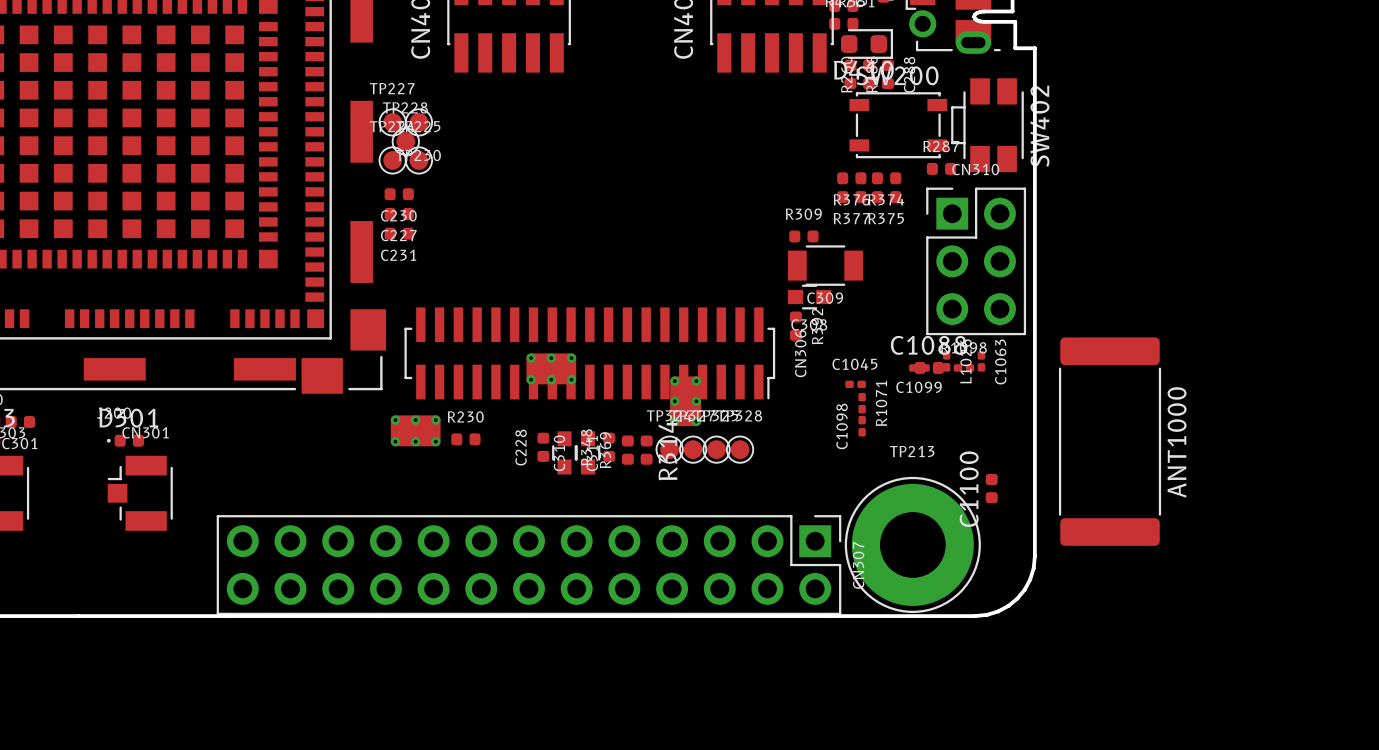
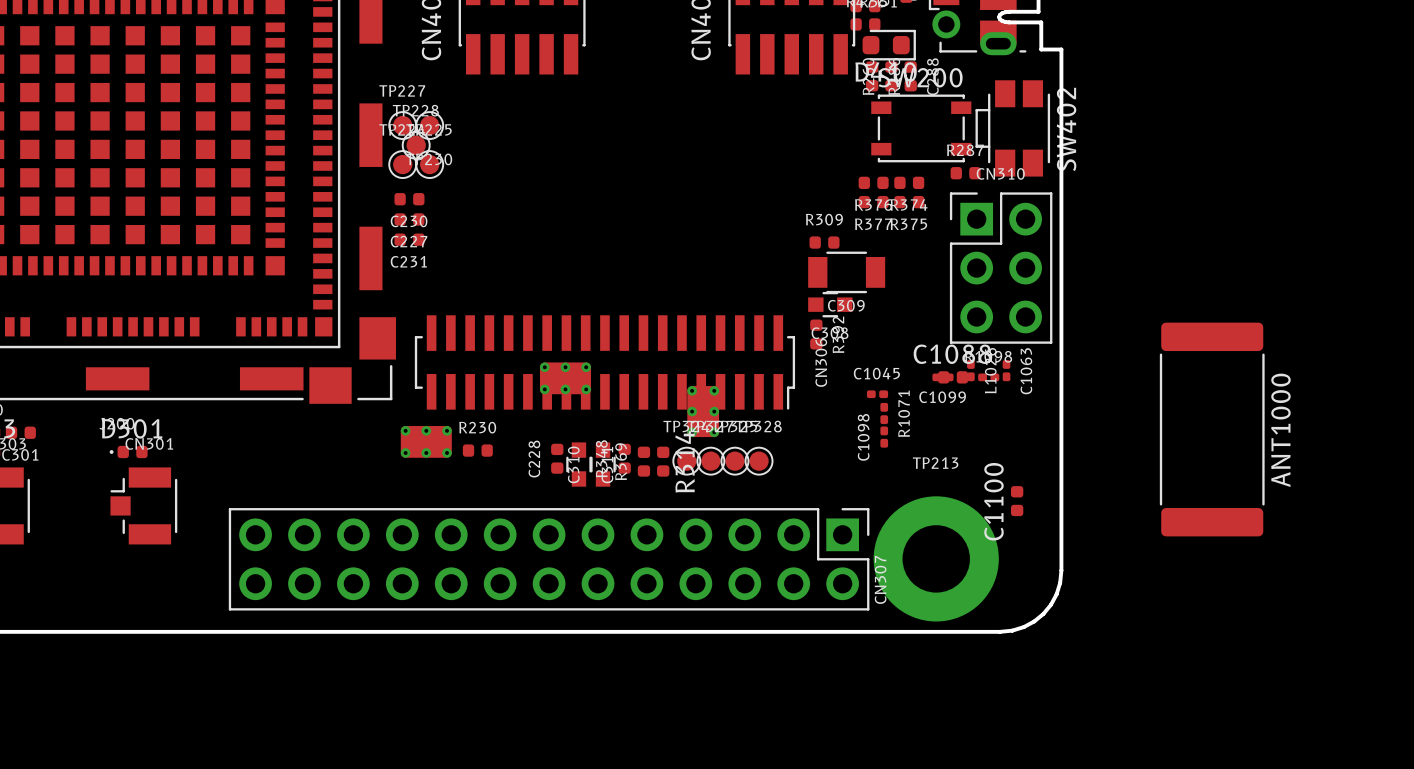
ANT1000 position: (1110, 441) -> (1212, 429)
TP213 footprint: [844, 476, 981, 614] -> [873, 496, 999, 622]
CN307 position: (528, 565) -> (549, 559)

